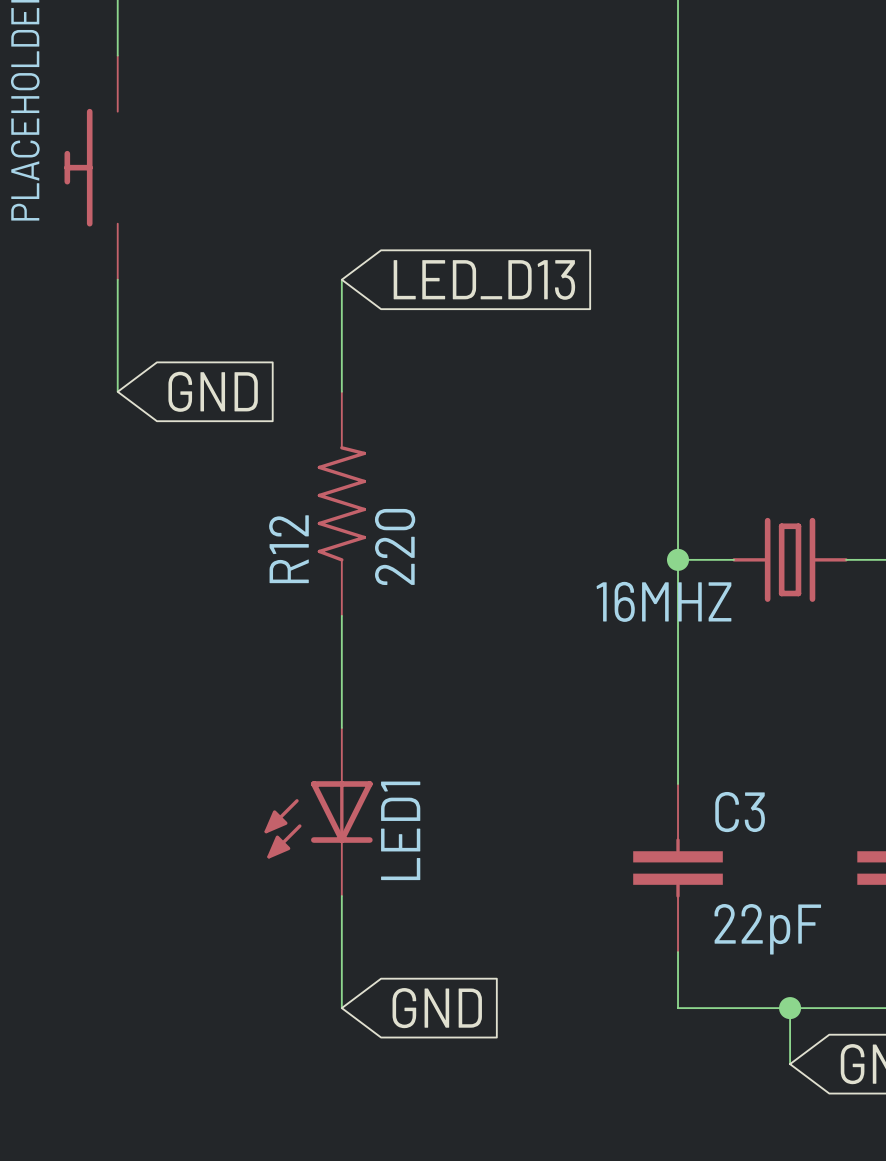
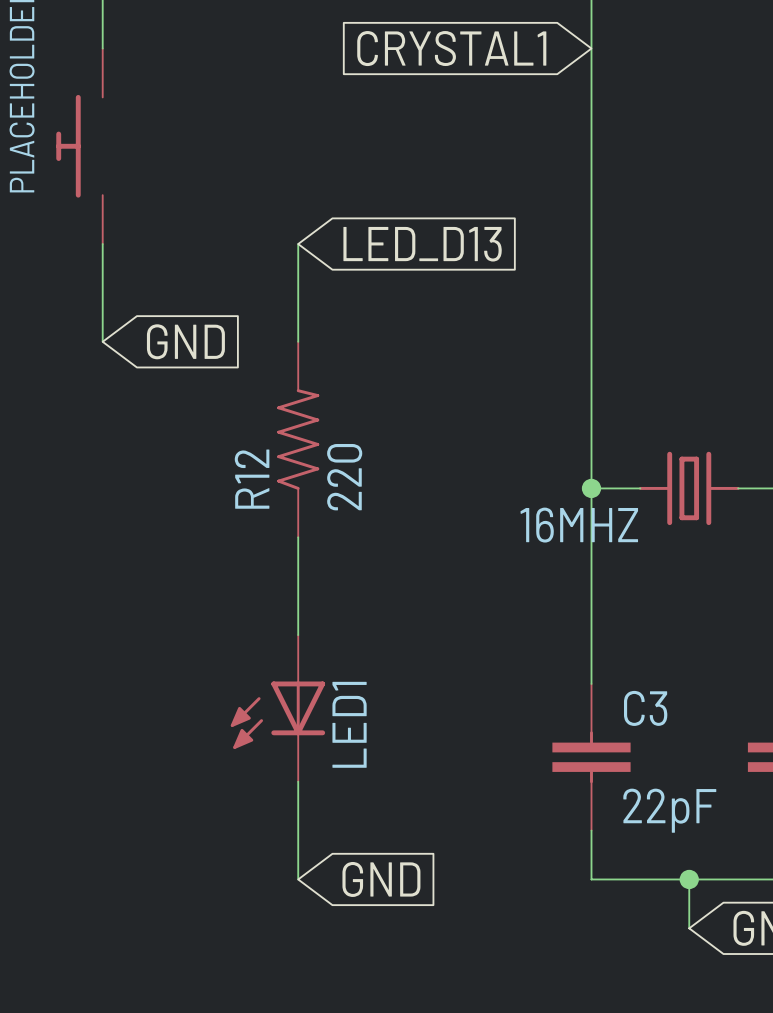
global label: none -> CRYSTAL1 (451, 48)

